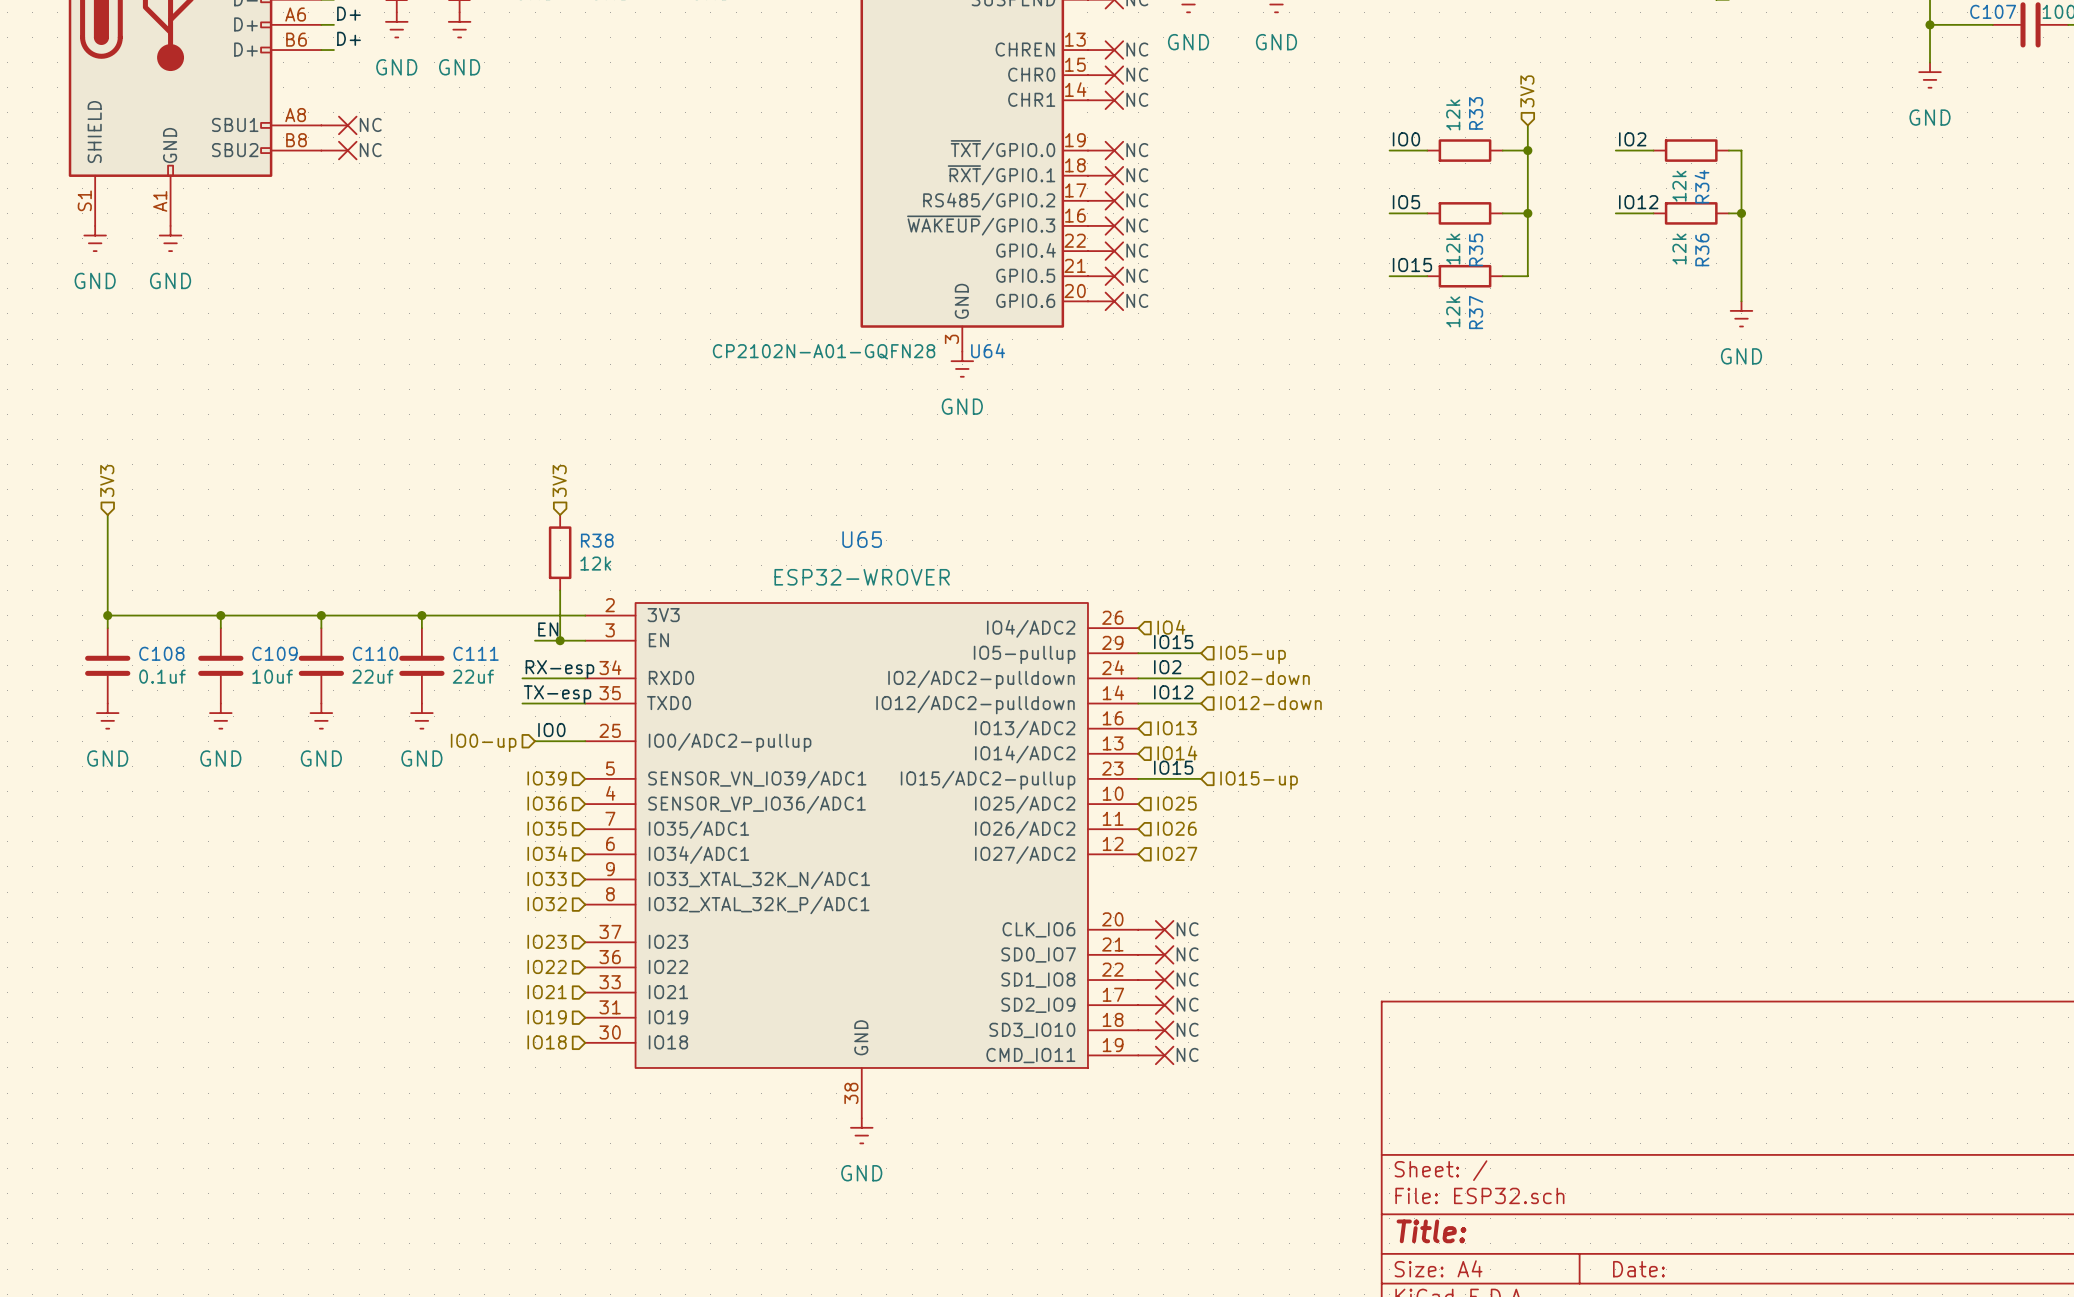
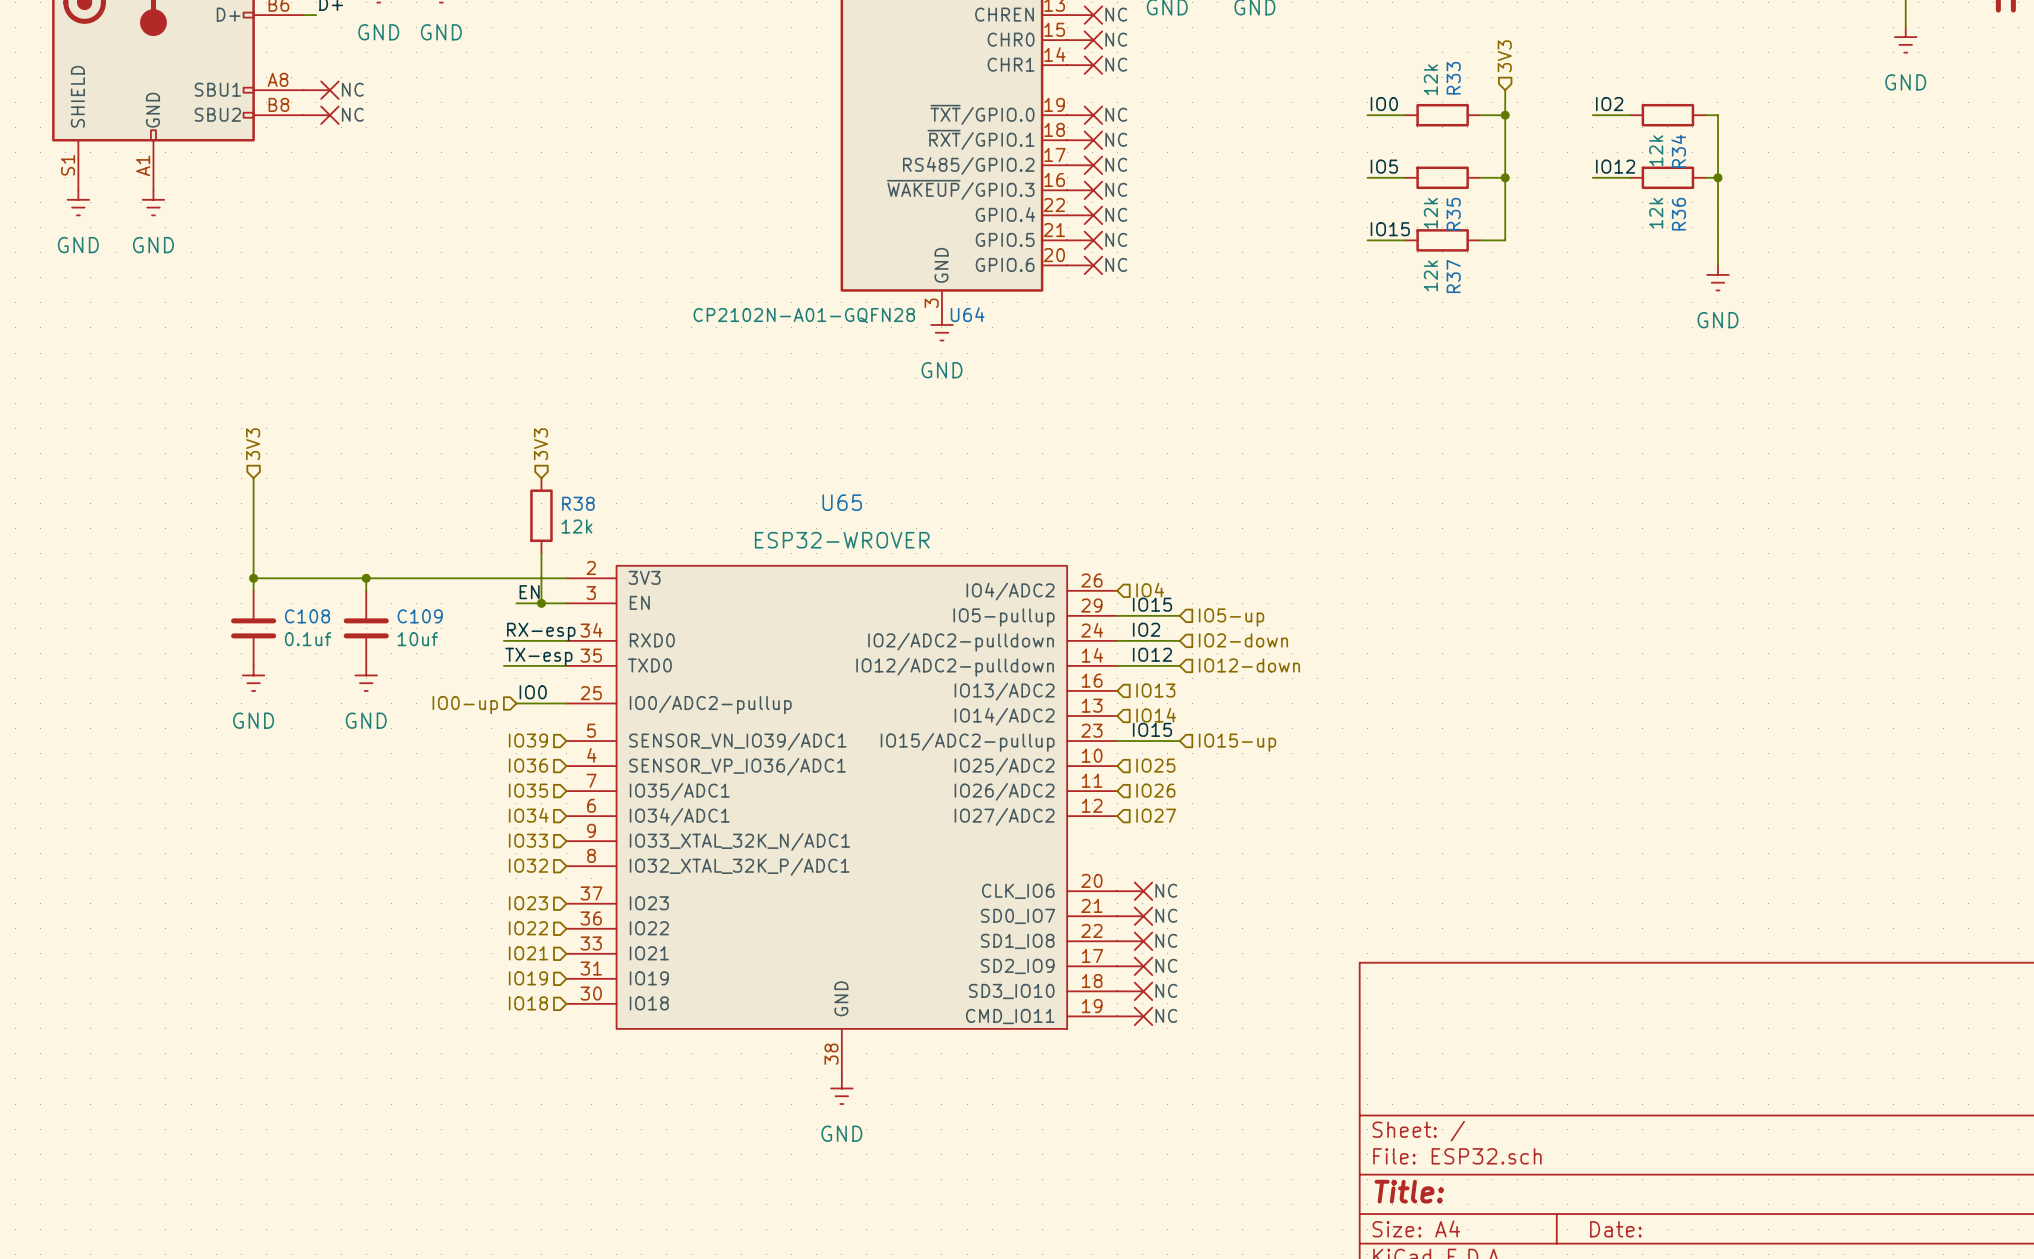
hierarchical label position: 3V3 (107, 481) -> 3V3 (253, 444)
wire: (107, 515) (107, 628) -> (253, 478) (253, 590)
wire: (107, 615) (271, 615) -> none
junction: (107, 615) -> none
wire: (220, 615) (220, 628) -> (366, 578) (366, 590)
junction: (220, 615) -> none
junction: none -> (253, 578)
wire: (321, 615) (321, 628) -> none
junction: (321, 615) -> none
junction: none -> (366, 578)
wire: (421, 615) (421, 628) -> none
junction: (421, 615) -> none
C108 position: (107, 665) -> (253, 628)
C109 position: (220, 665) -> (366, 628)
C110: 22uf (321, 665) -> none
C111: 22uf (421, 665) -> none
power symbol: GND (107, 716) -> none
power symbol: GND (220, 716) -> none
power symbol: none -> GND (253, 678)
power symbol: GND (321, 716) -> none
power symbol: none -> GND (366, 678)
power symbol: GND (421, 716) -> none

